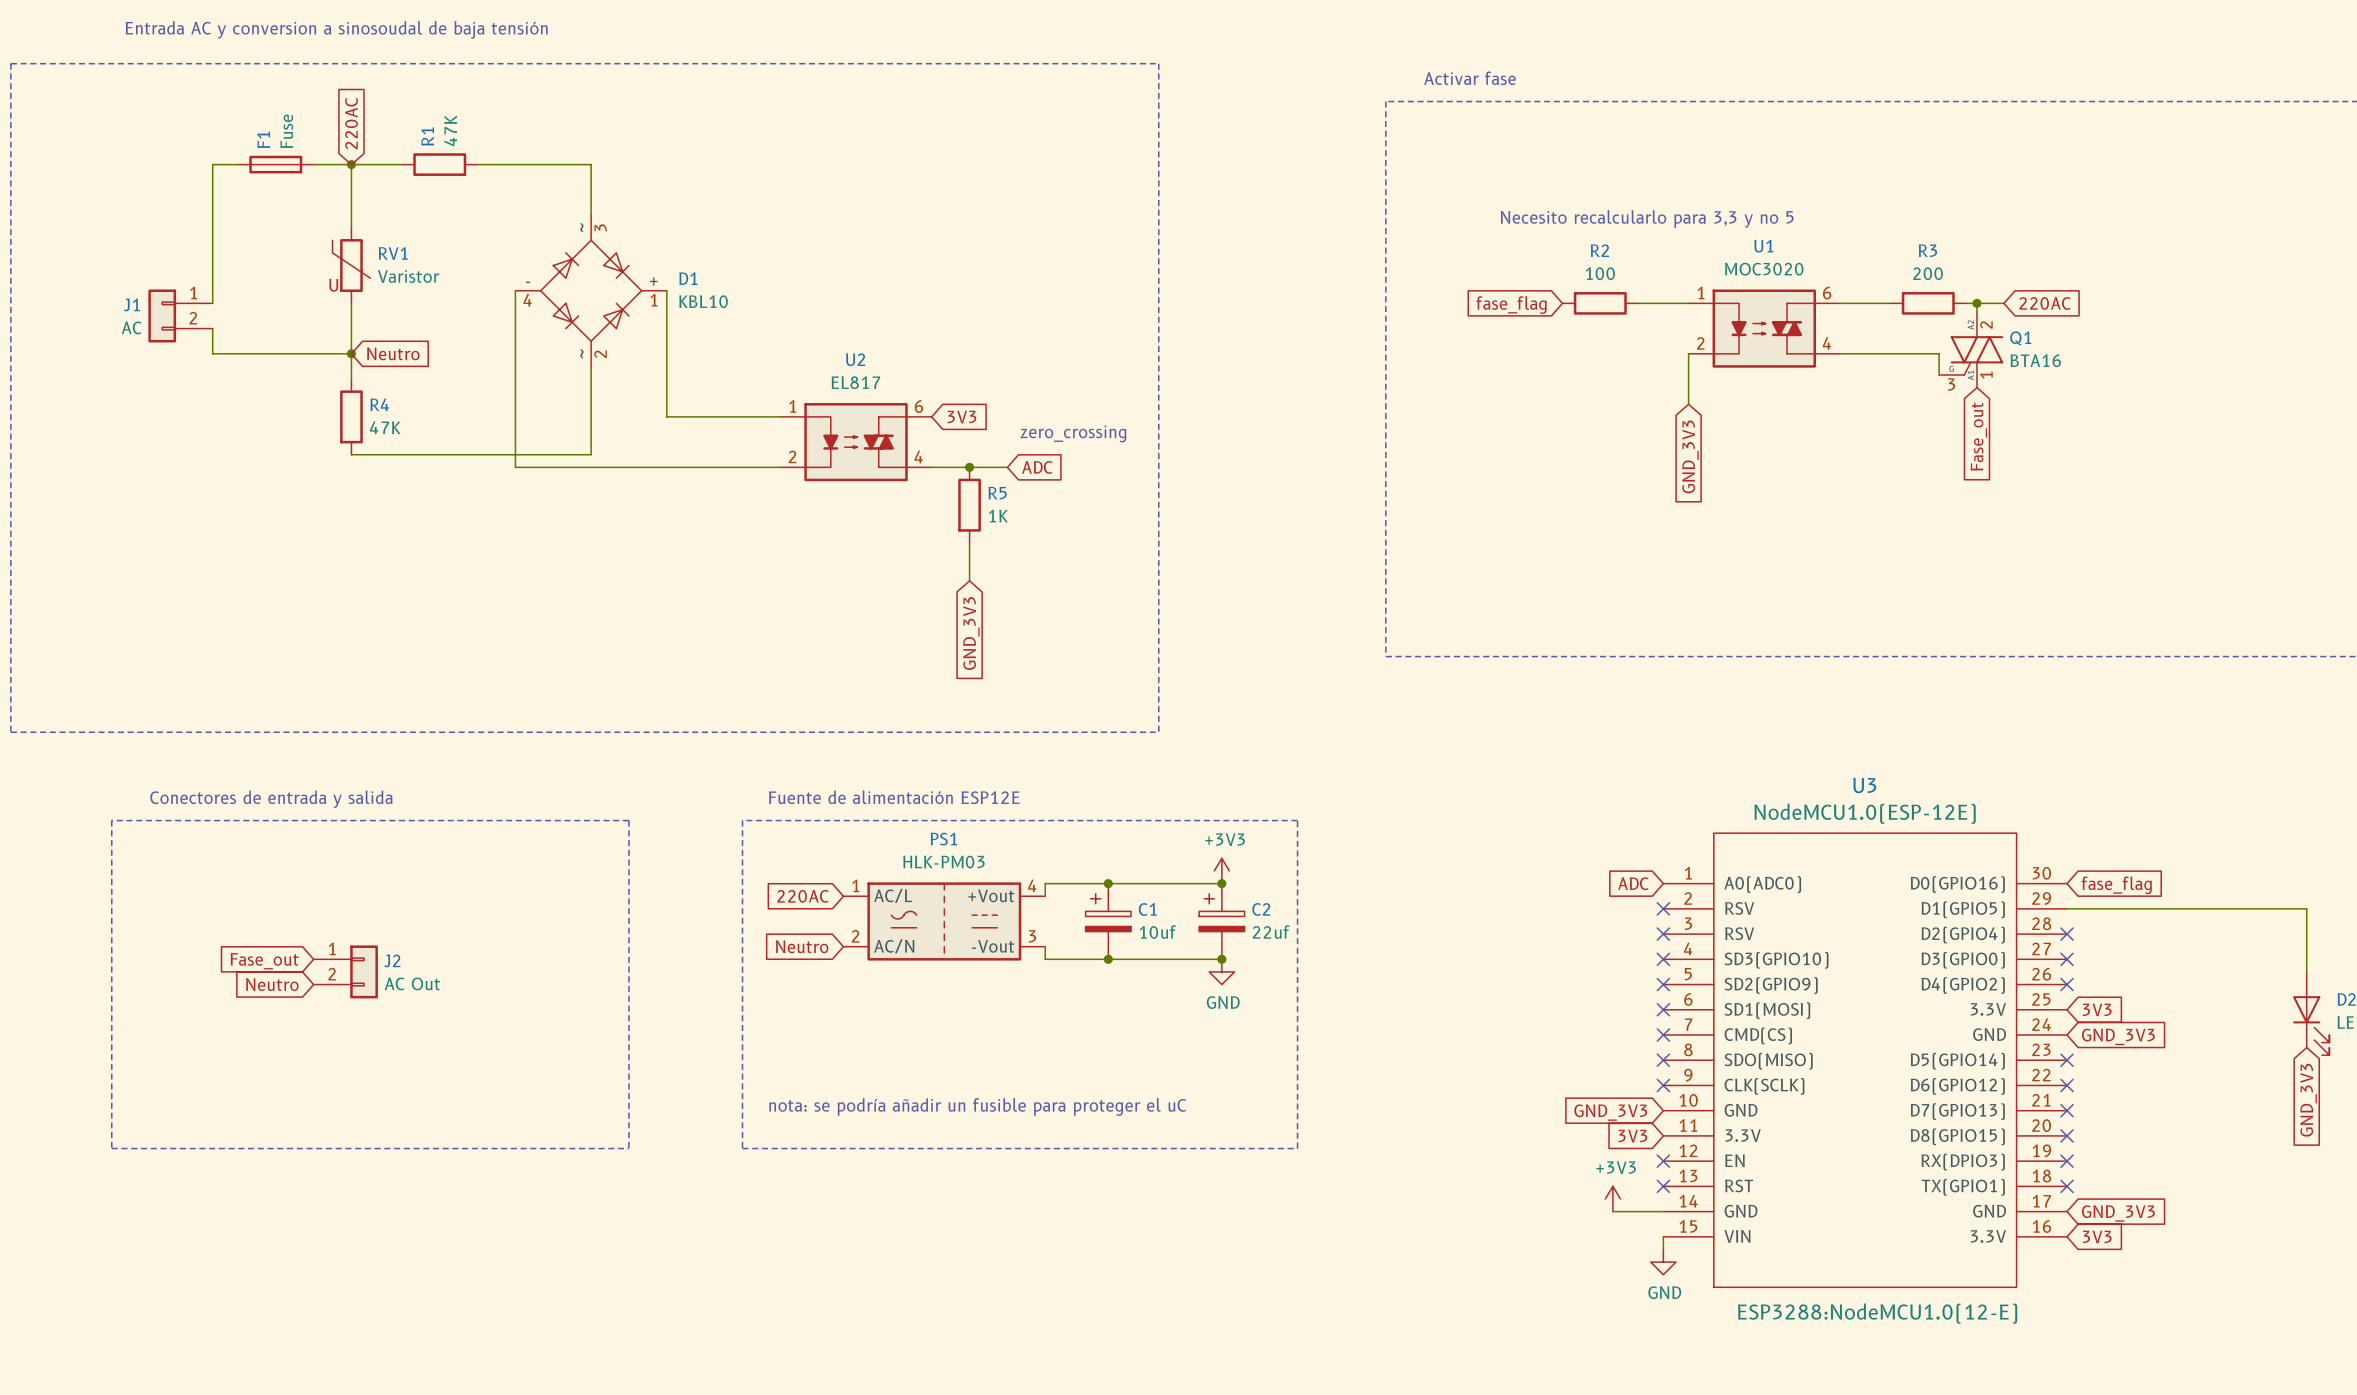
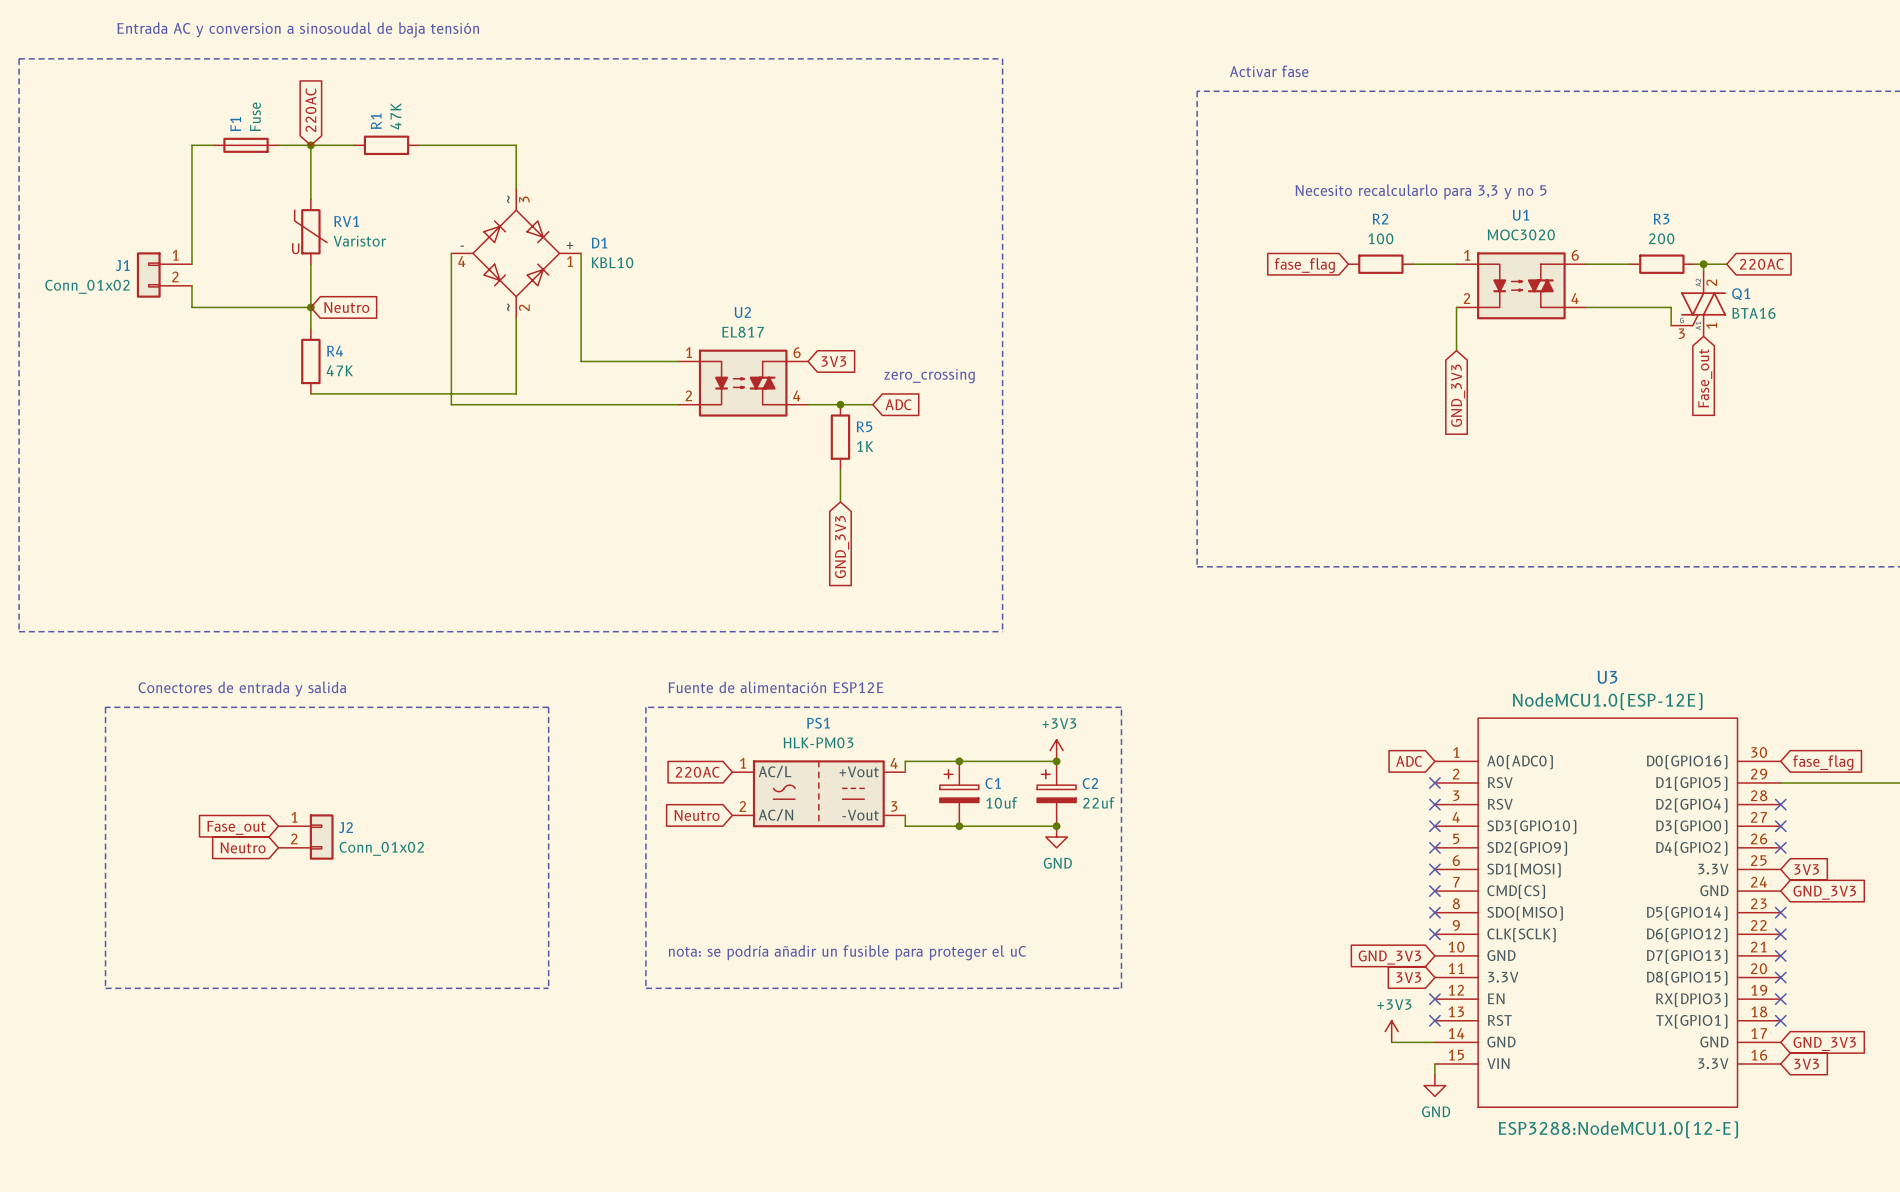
J1 value: AC (131, 327) -> Conn_01x02 (87, 286)
J2 value: AC Out (412, 983) -> Conn_01x02 (381, 848)

